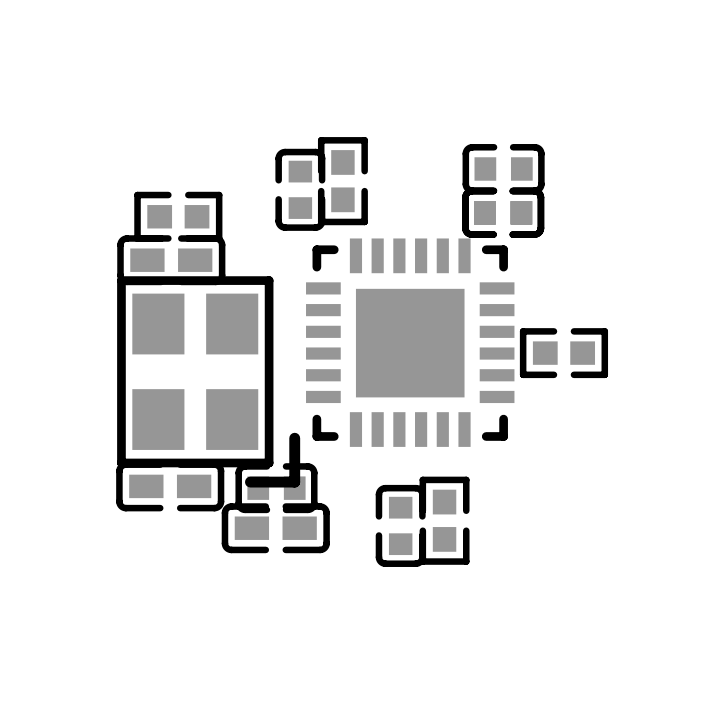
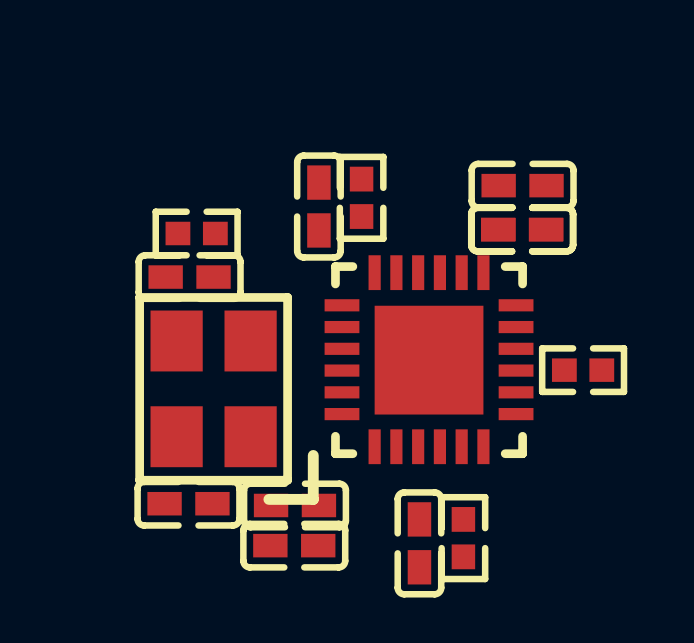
part footprint: [462, 144, 545, 194] -> [468, 160, 577, 211]
part footprint: [275, 148, 326, 231] -> [293, 152, 344, 261]
part footprint: [462, 187, 545, 238] -> [467, 204, 577, 255]
part footprint: [235, 463, 318, 514] -> [240, 480, 350, 531]
part footprint: [375, 484, 426, 567] -> [394, 489, 445, 598]

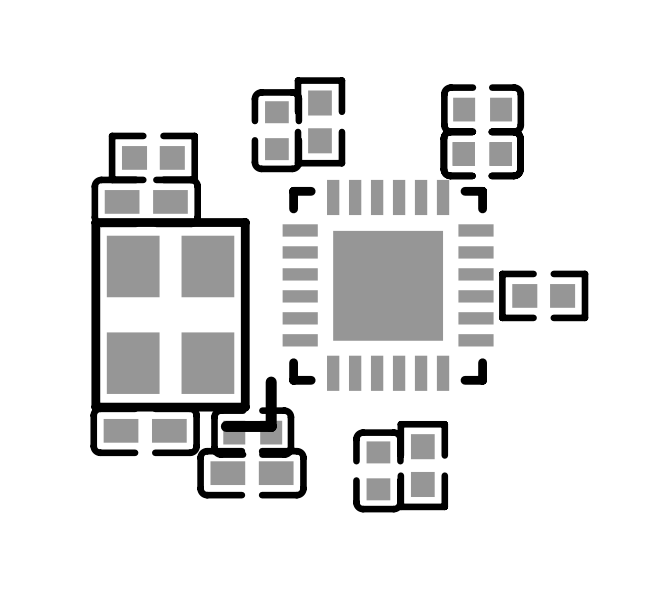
part footprint: [293, 152, 344, 261] -> [251, 89, 303, 173]
part footprint: [468, 160, 577, 211] -> [441, 84, 525, 135]
part footprint: [467, 204, 577, 255] -> [440, 128, 524, 180]
part footprint: [240, 480, 350, 531] -> [211, 407, 295, 458]
part footprint: [394, 489, 445, 598] -> [353, 429, 404, 513]

